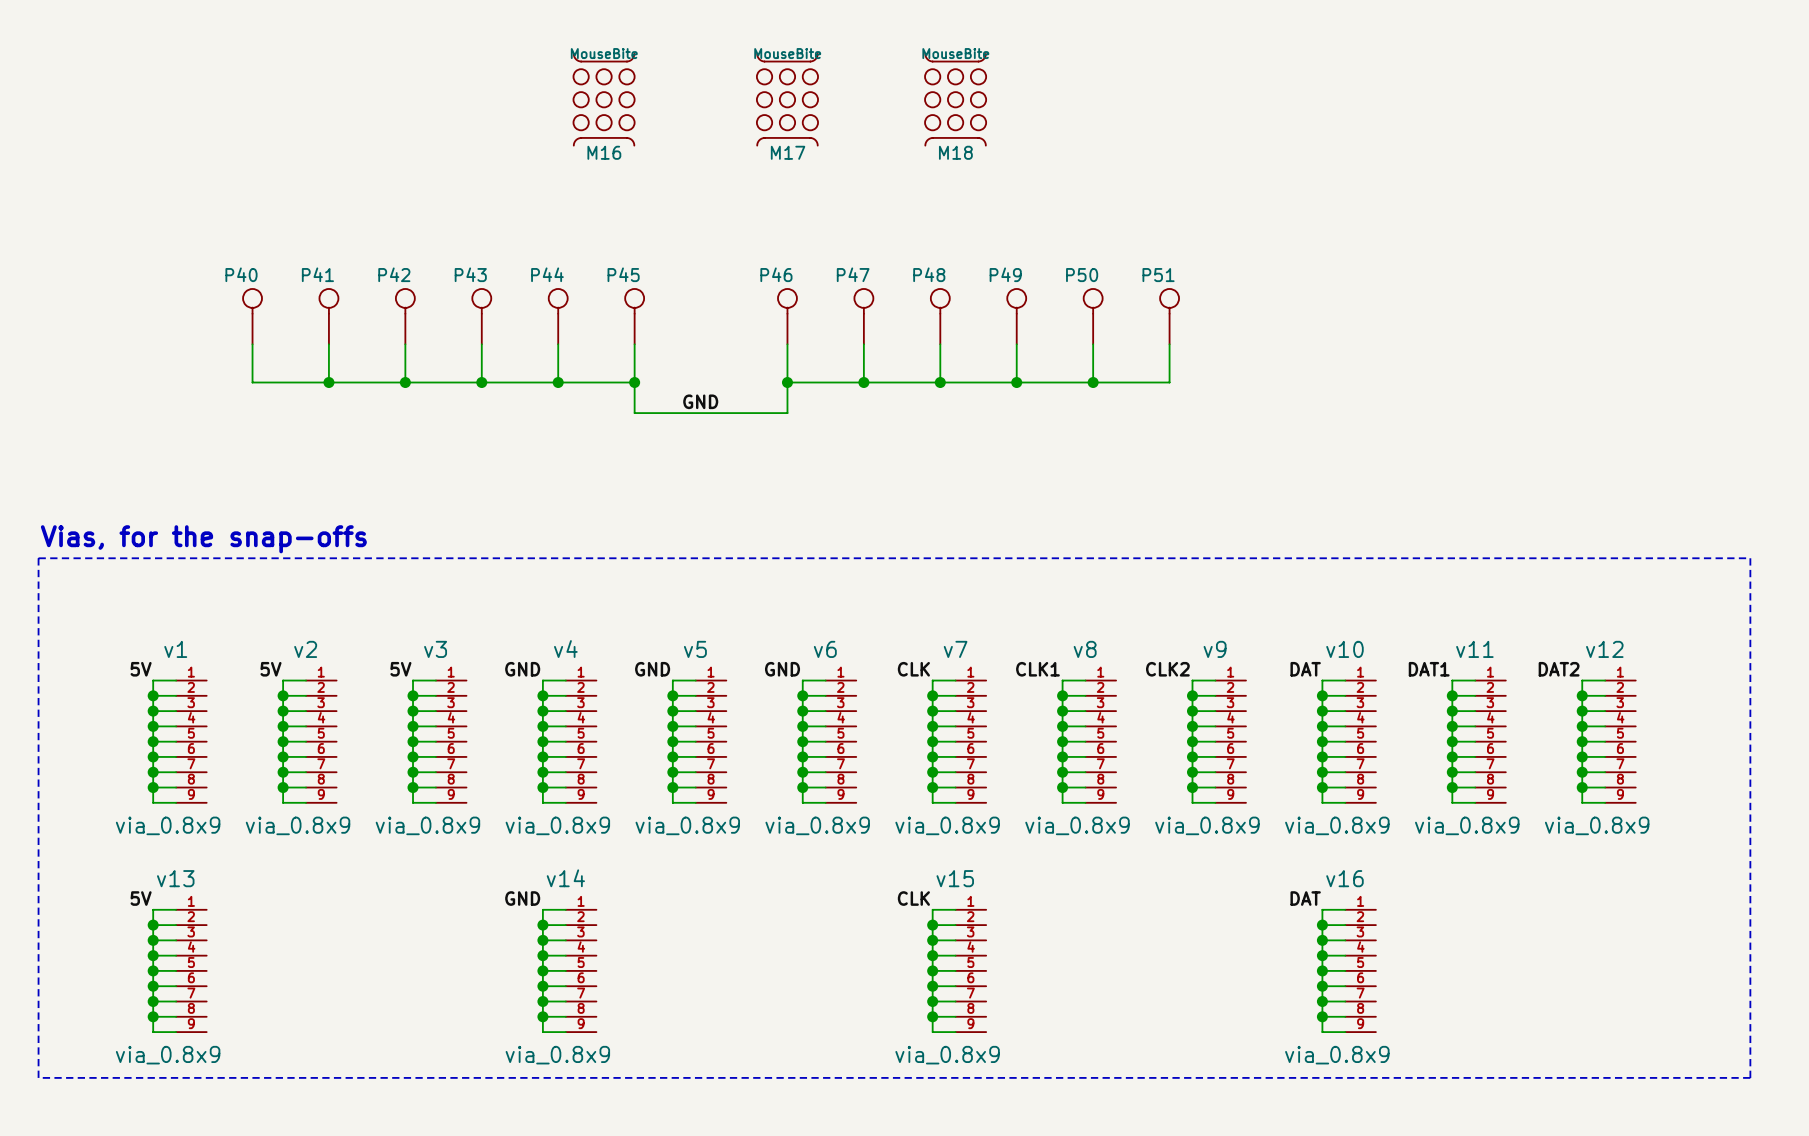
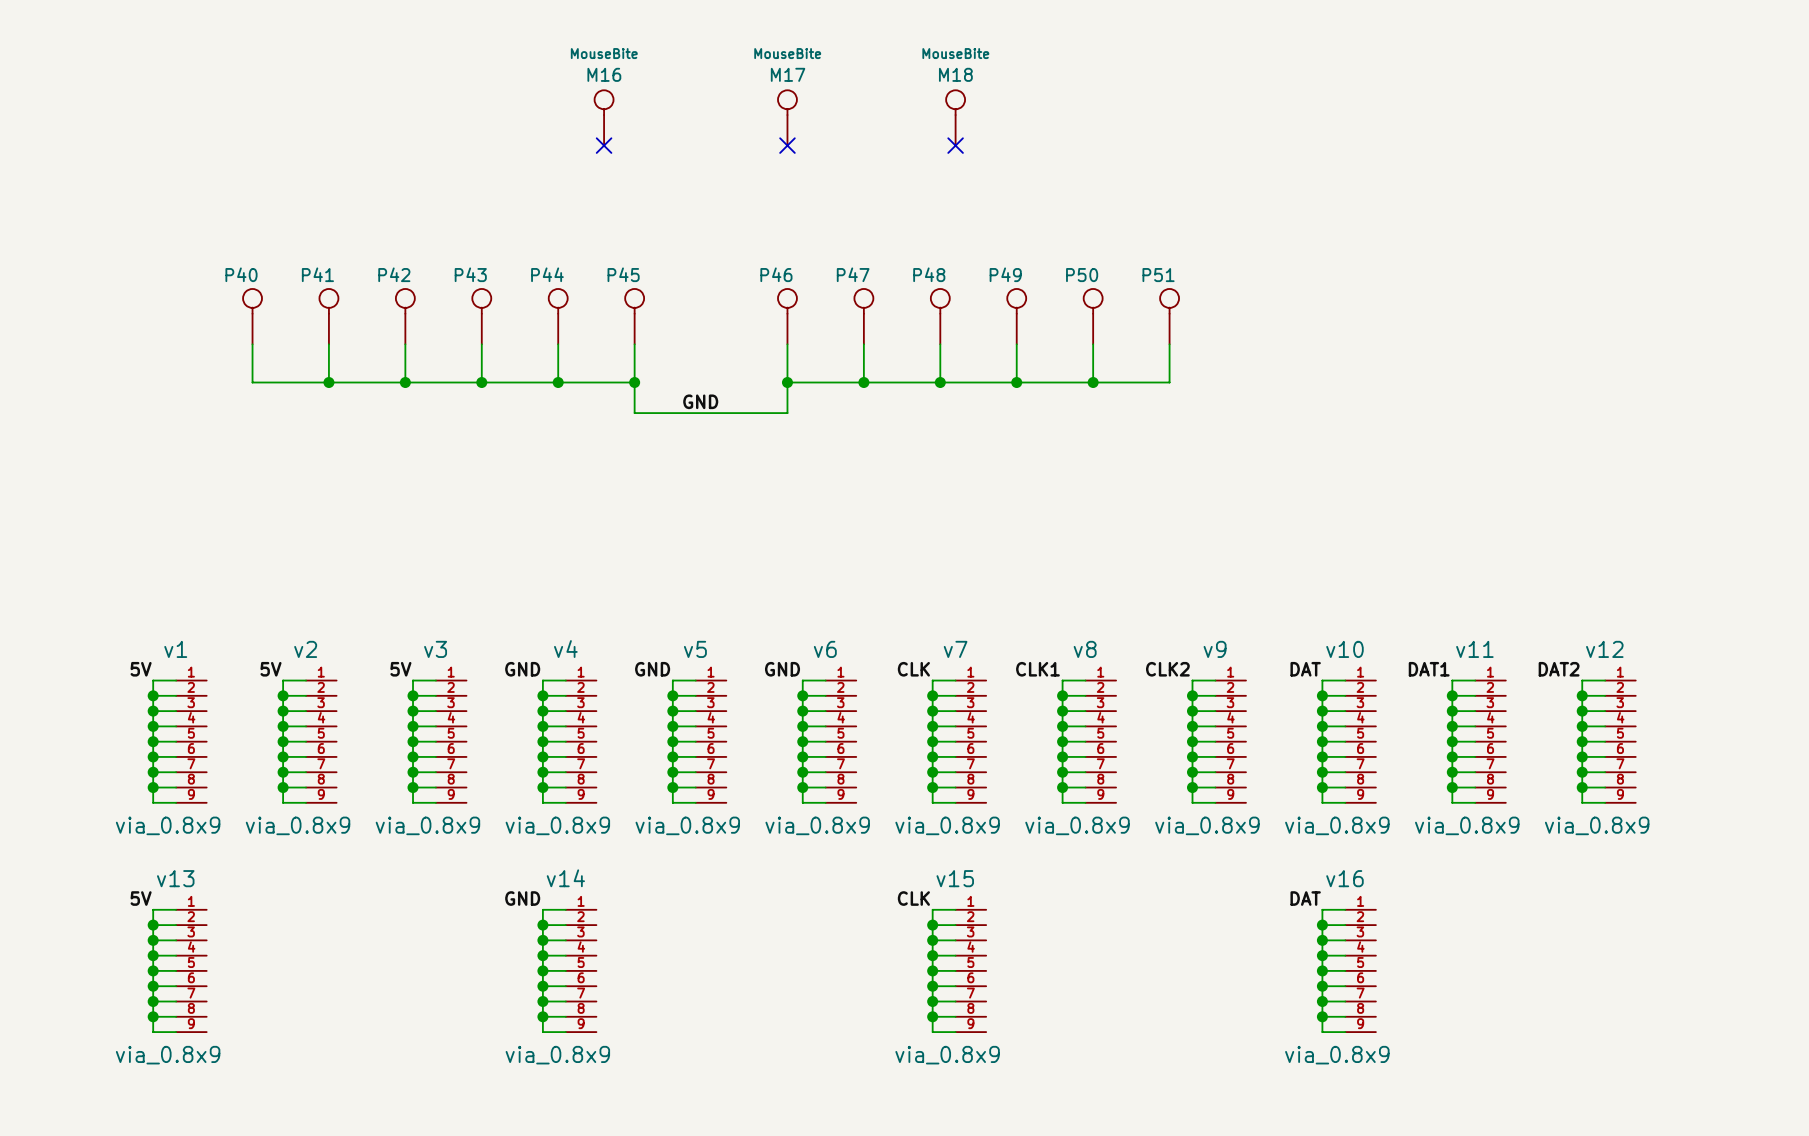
M16 symbol: [573, 53, 635, 146] -> [594, 90, 614, 146]
M17 symbol: [756, 53, 819, 146] -> [777, 90, 797, 146]
M18 symbol: [925, 53, 987, 146] -> [946, 90, 966, 146]
no-connect mark: none -> (604, 145)
no-connect mark: none -> (787, 145)
no-connect mark: none -> (955, 145)
M16 name position: M16 (604, 152) -> M16 (604, 74)
M17 name position: M17 (788, 152) -> M17 (788, 74)
M18 name position: M18 (955, 152) -> M18 (955, 74)
text: Vias, for the snap-offs (203, 539) -> none
line: (38, 558) (1750, 558) (1750, 1077) (38, 1077) (38, 558) -> none

